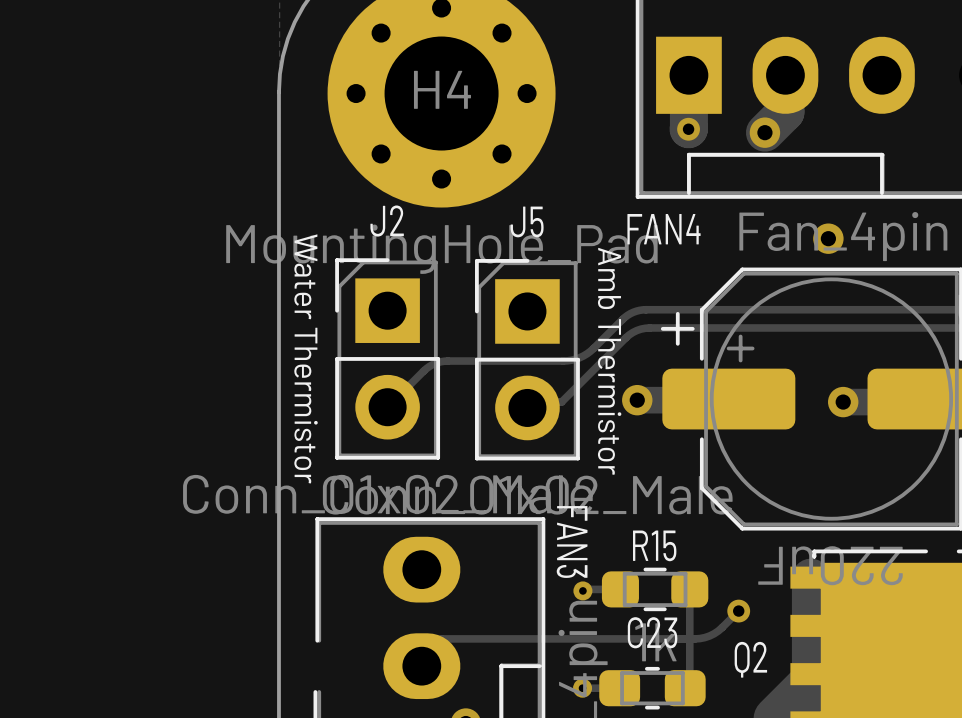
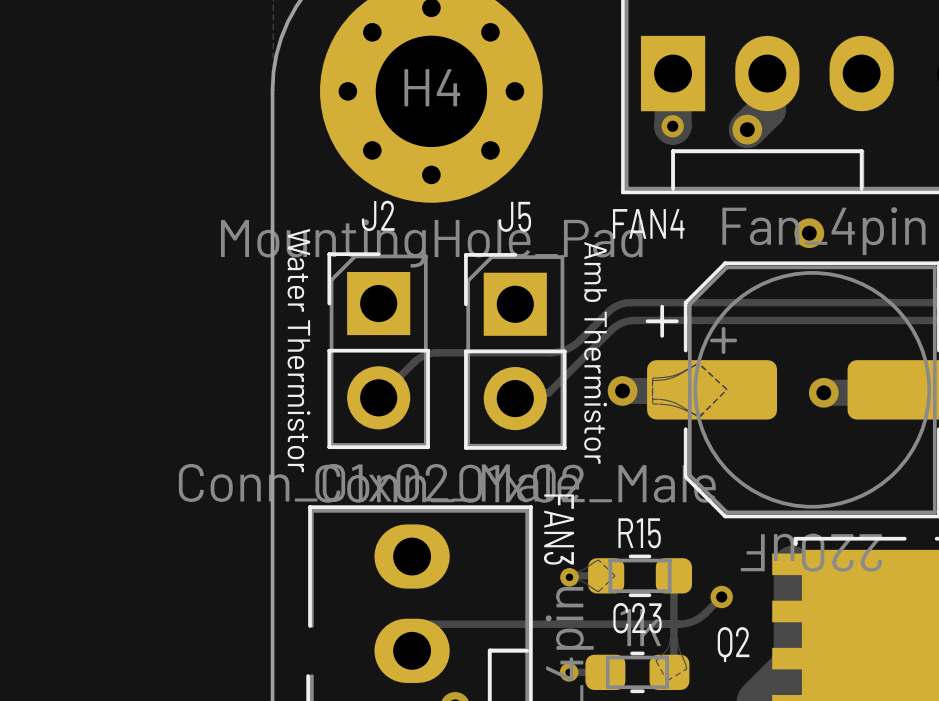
zone outline: none -> (685, 370) (699, 363) (726, 389) (699, 416) (674, 402) (652, 399) (652, 380) (669, 378) (685, 370)
zone outline: none -> (685, 370) (698, 363) (726, 389) (700, 417) (674, 406) (652, 403) (652, 377) (669, 376) (685, 370)
zone outline: none -> (598, 559) (614, 575) (598, 591) (581, 581) (571, 579) (571, 572) (581, 570) (598, 559)
zone outline: none -> (670, 637) (667, 649) (656, 660) (667, 680) (686, 668) (679, 648) (677, 637) (670, 637)

